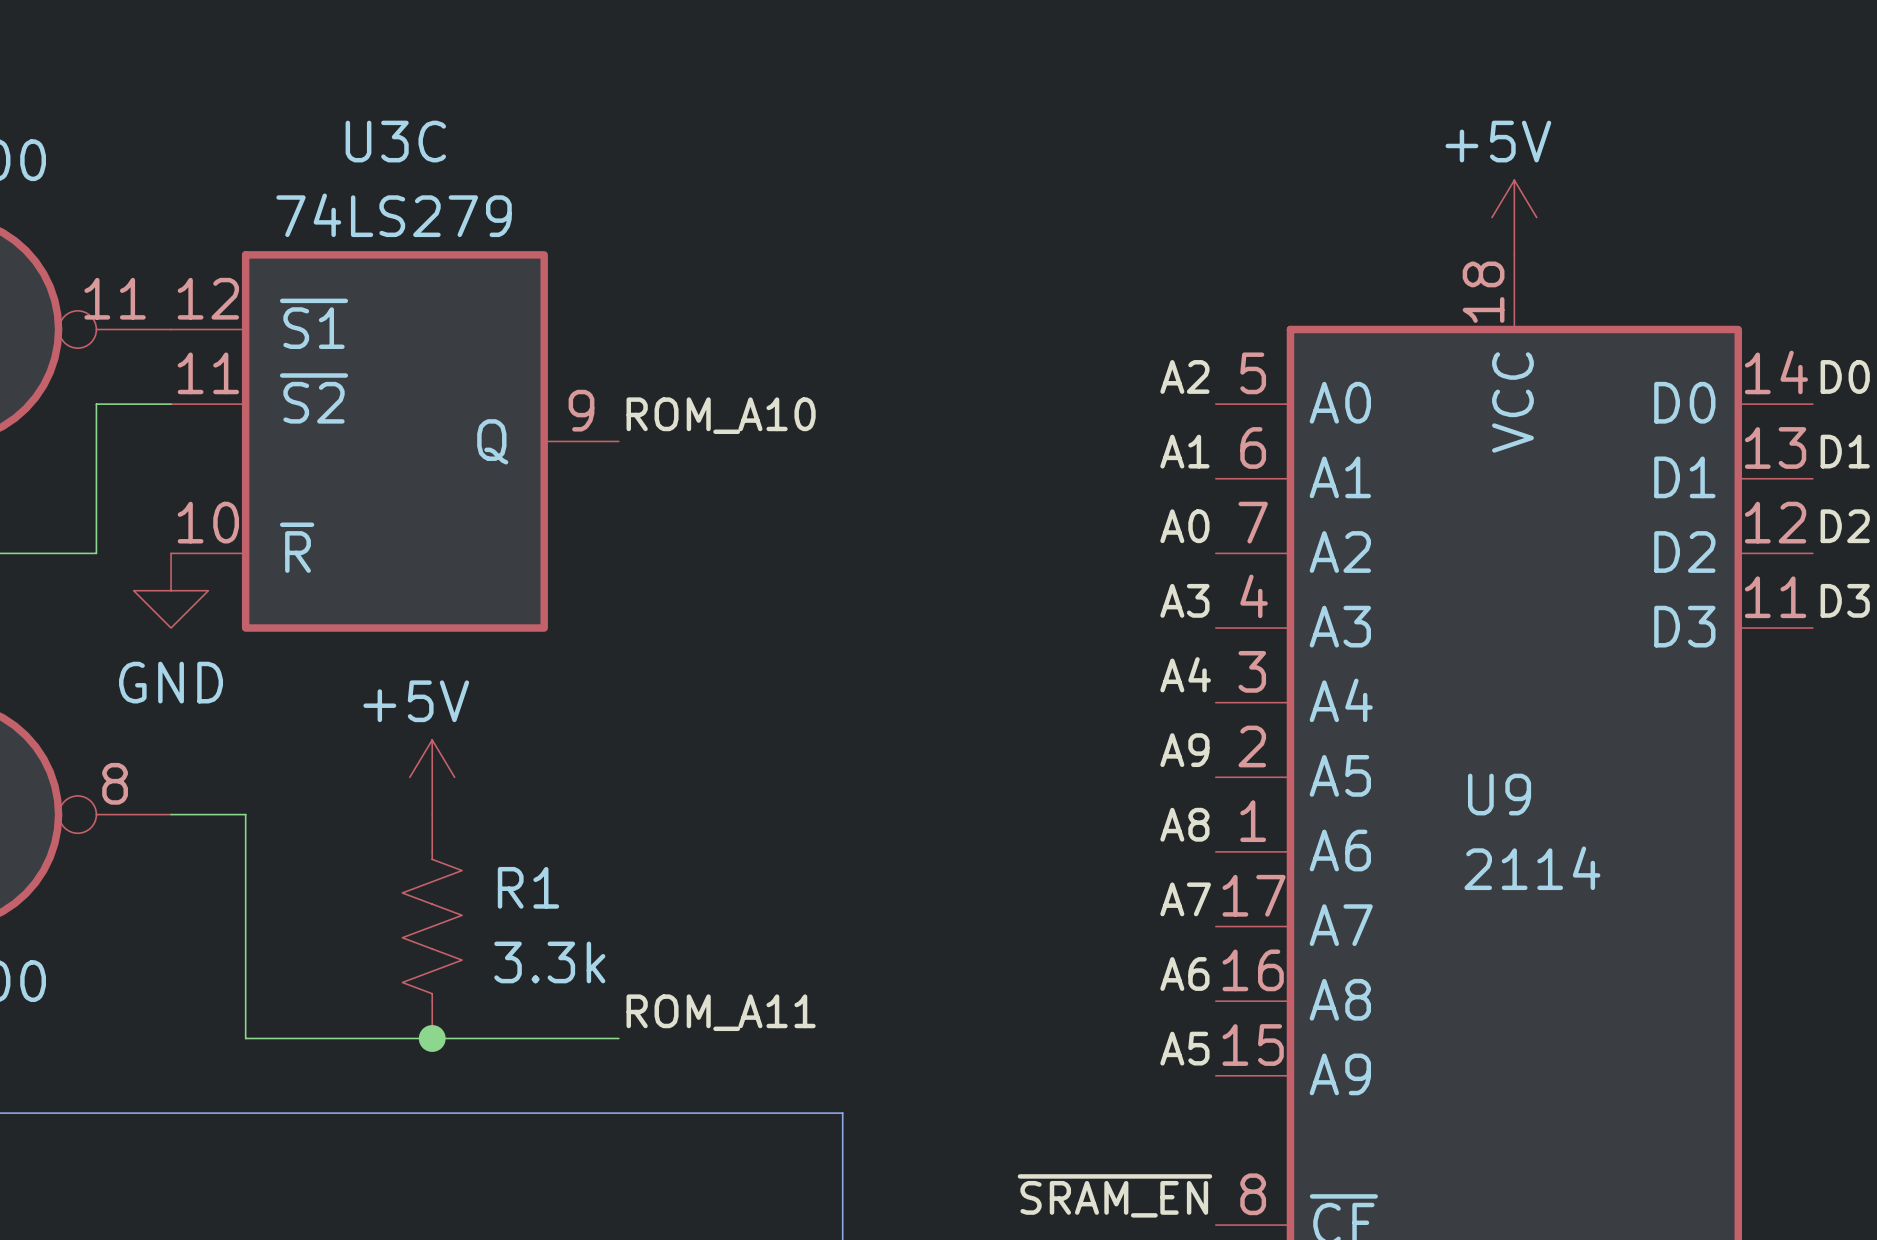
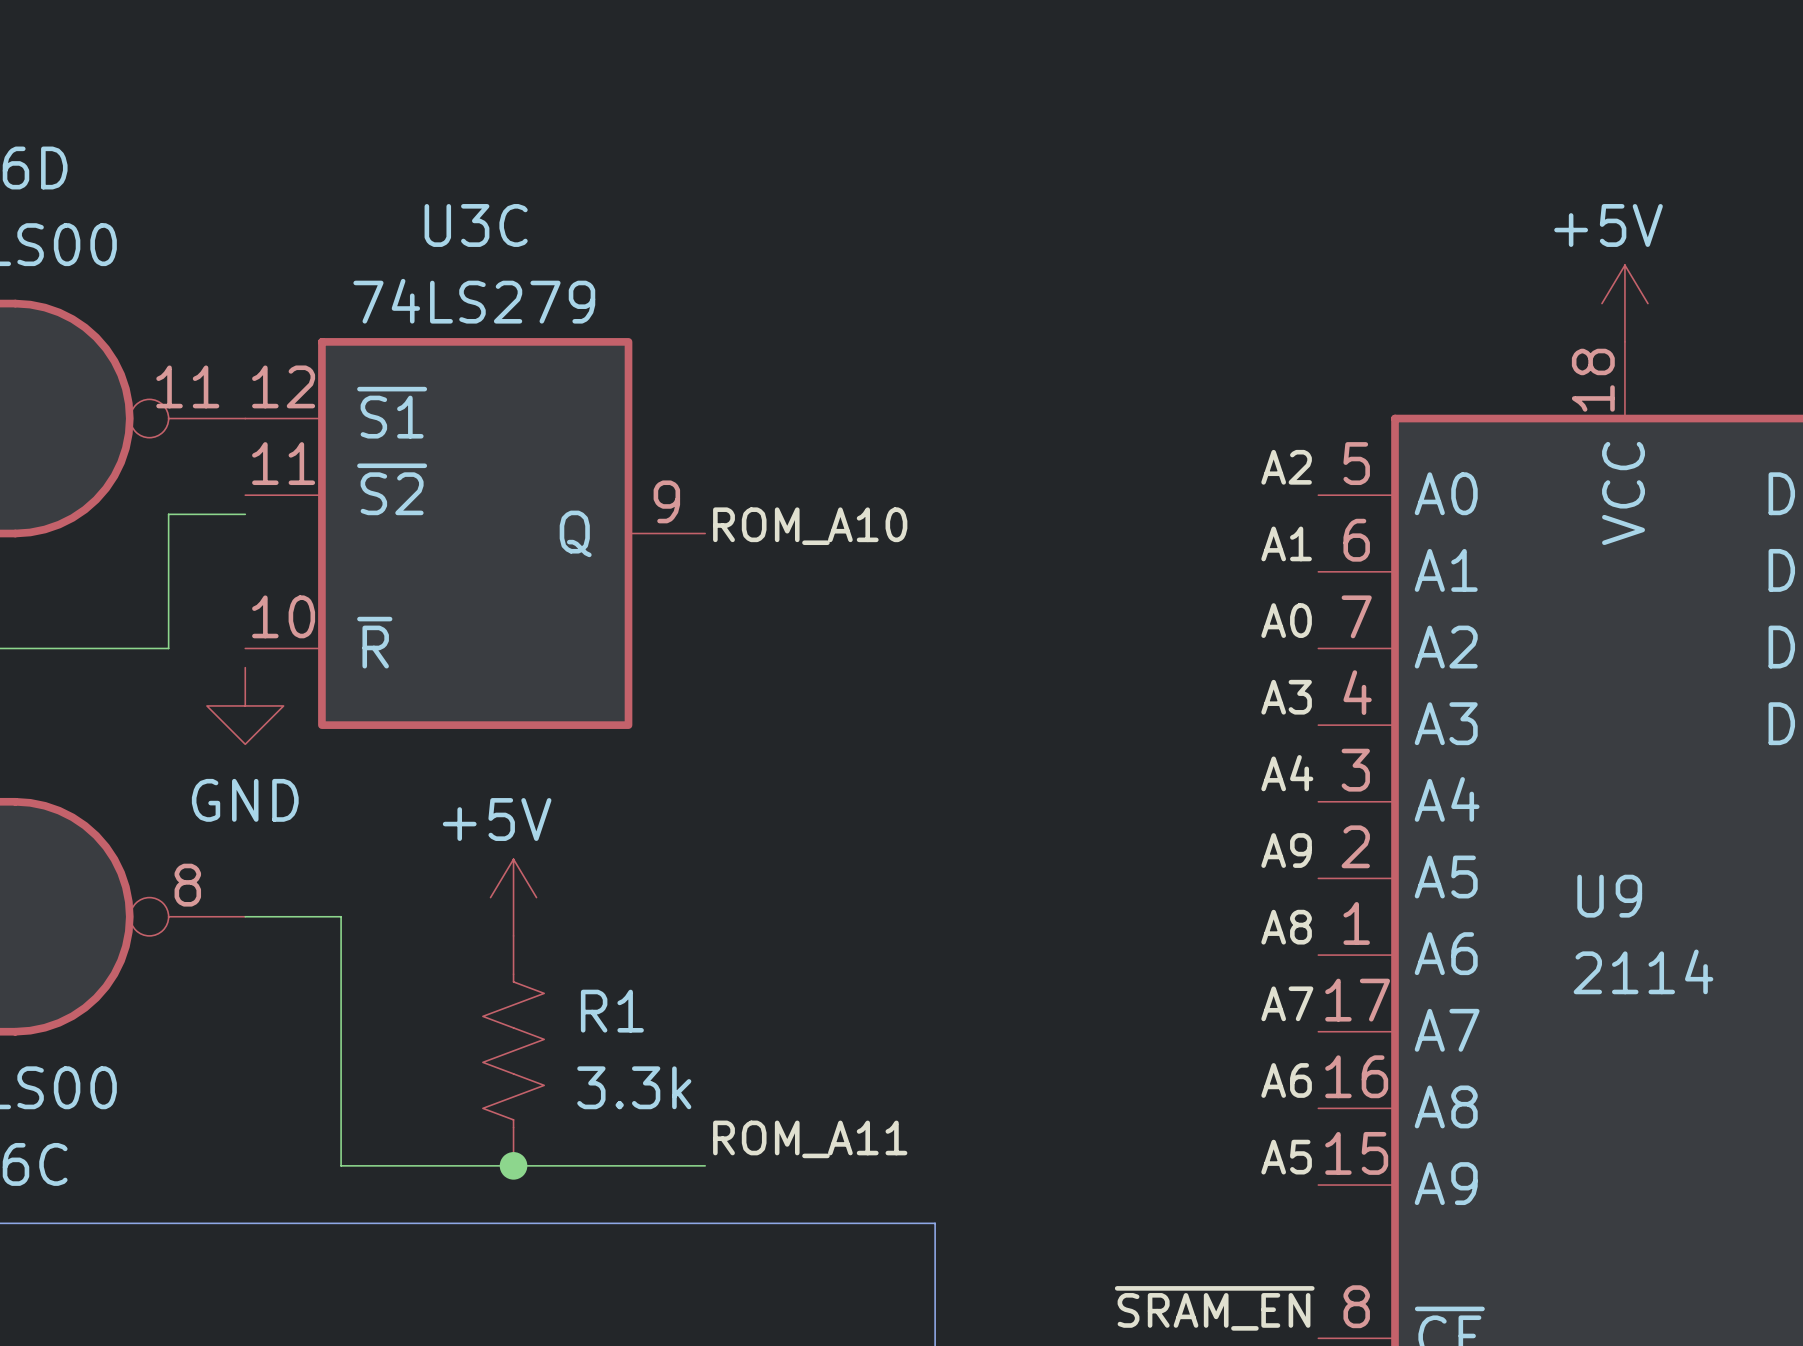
wire: (171, 404) (96, 404) (96, 422) -> (245, 514) (168, 514)
label position: ROM_A10 (721, 415) -> ROM_A10 (810, 526)
power symbol position: GND (171, 590) -> GND (245, 705)
power symbol position: +5V (432, 777) -> +5V (513, 897)
wire: (245, 814) (245, 1038) (618, 1038) -> (321, 916) (341, 916) (341, 1165) (705, 1165)
R1 position: (432, 926) -> (513, 1050)
label position: ROM_A11 (721, 1012) -> ROM_A11 (810, 1139)
junction position: (432, 1038) -> (513, 1165)

